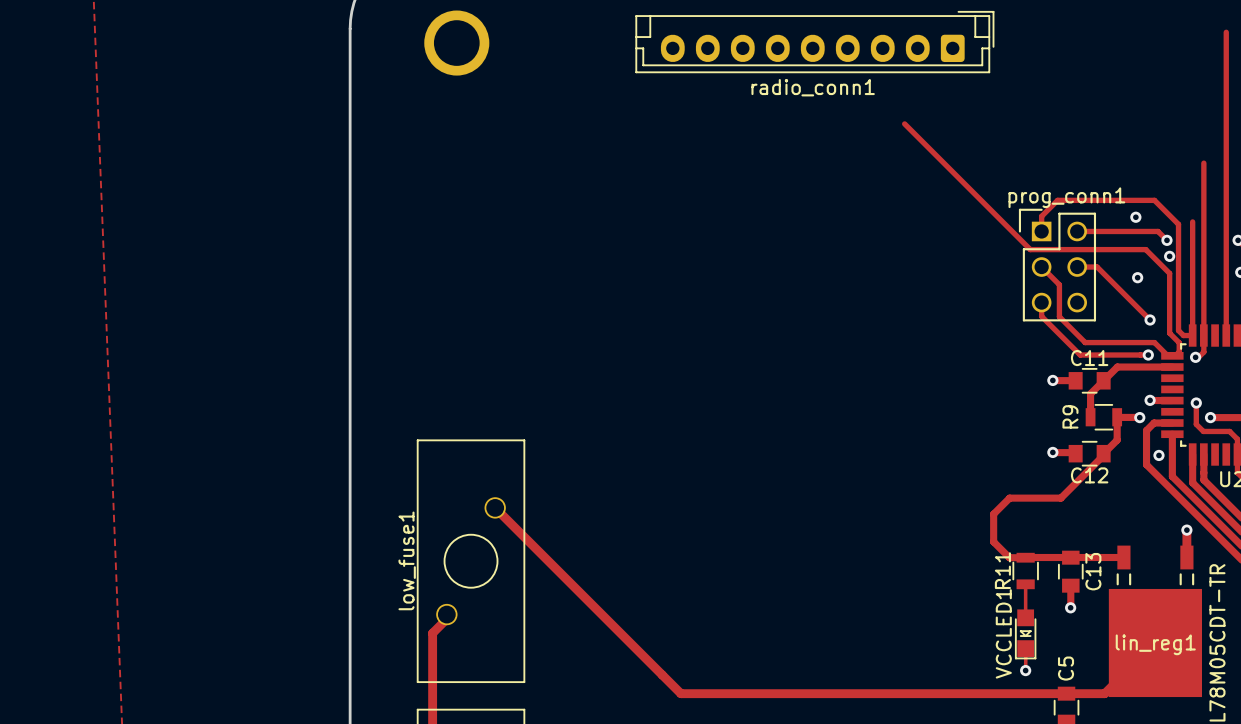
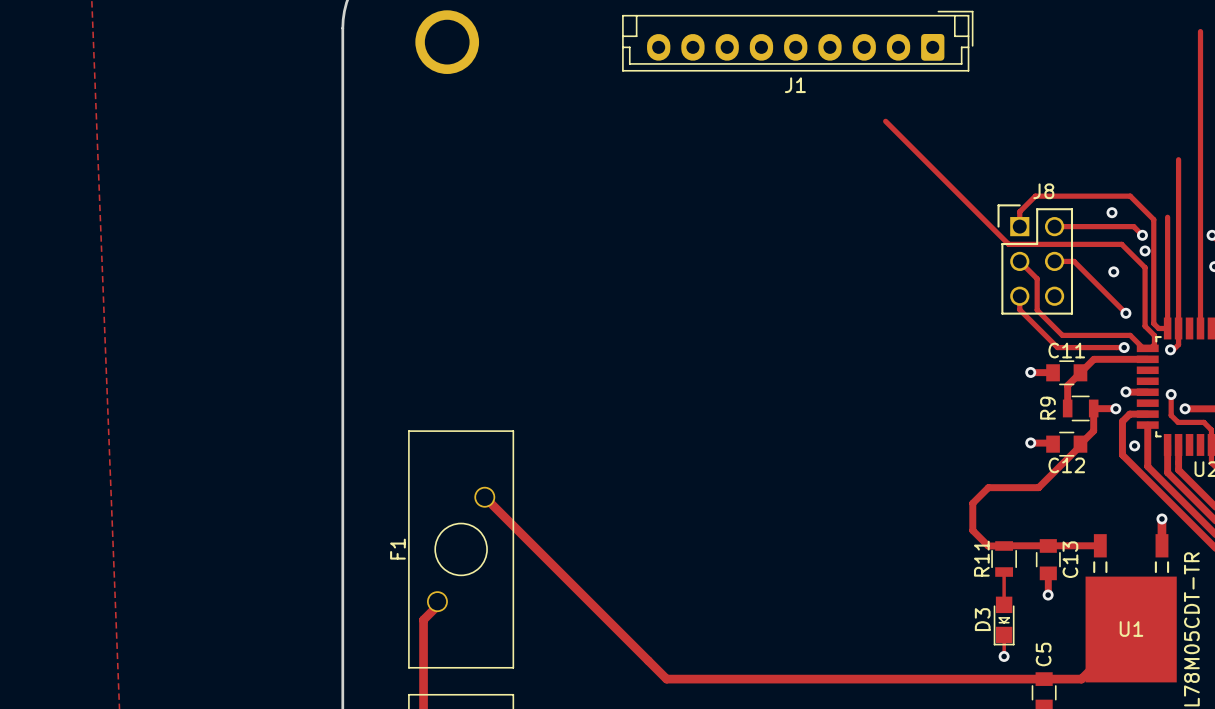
radio_conn1 name: radio_conn1 (813, 87) -> J1 (795, 85)
prog_conn1 name: prog_conn1 (1066, 197) -> J8 (1043, 191)
low_fuse1 name: low_fuse1 (407, 560) -> F1 (397, 549)
VCCLED1 name: VCCLED1 (1003, 633) -> D3 (982, 619)
lin_reg1 name: lin_reg1 (1155, 644) -> U1 (1131, 628)

